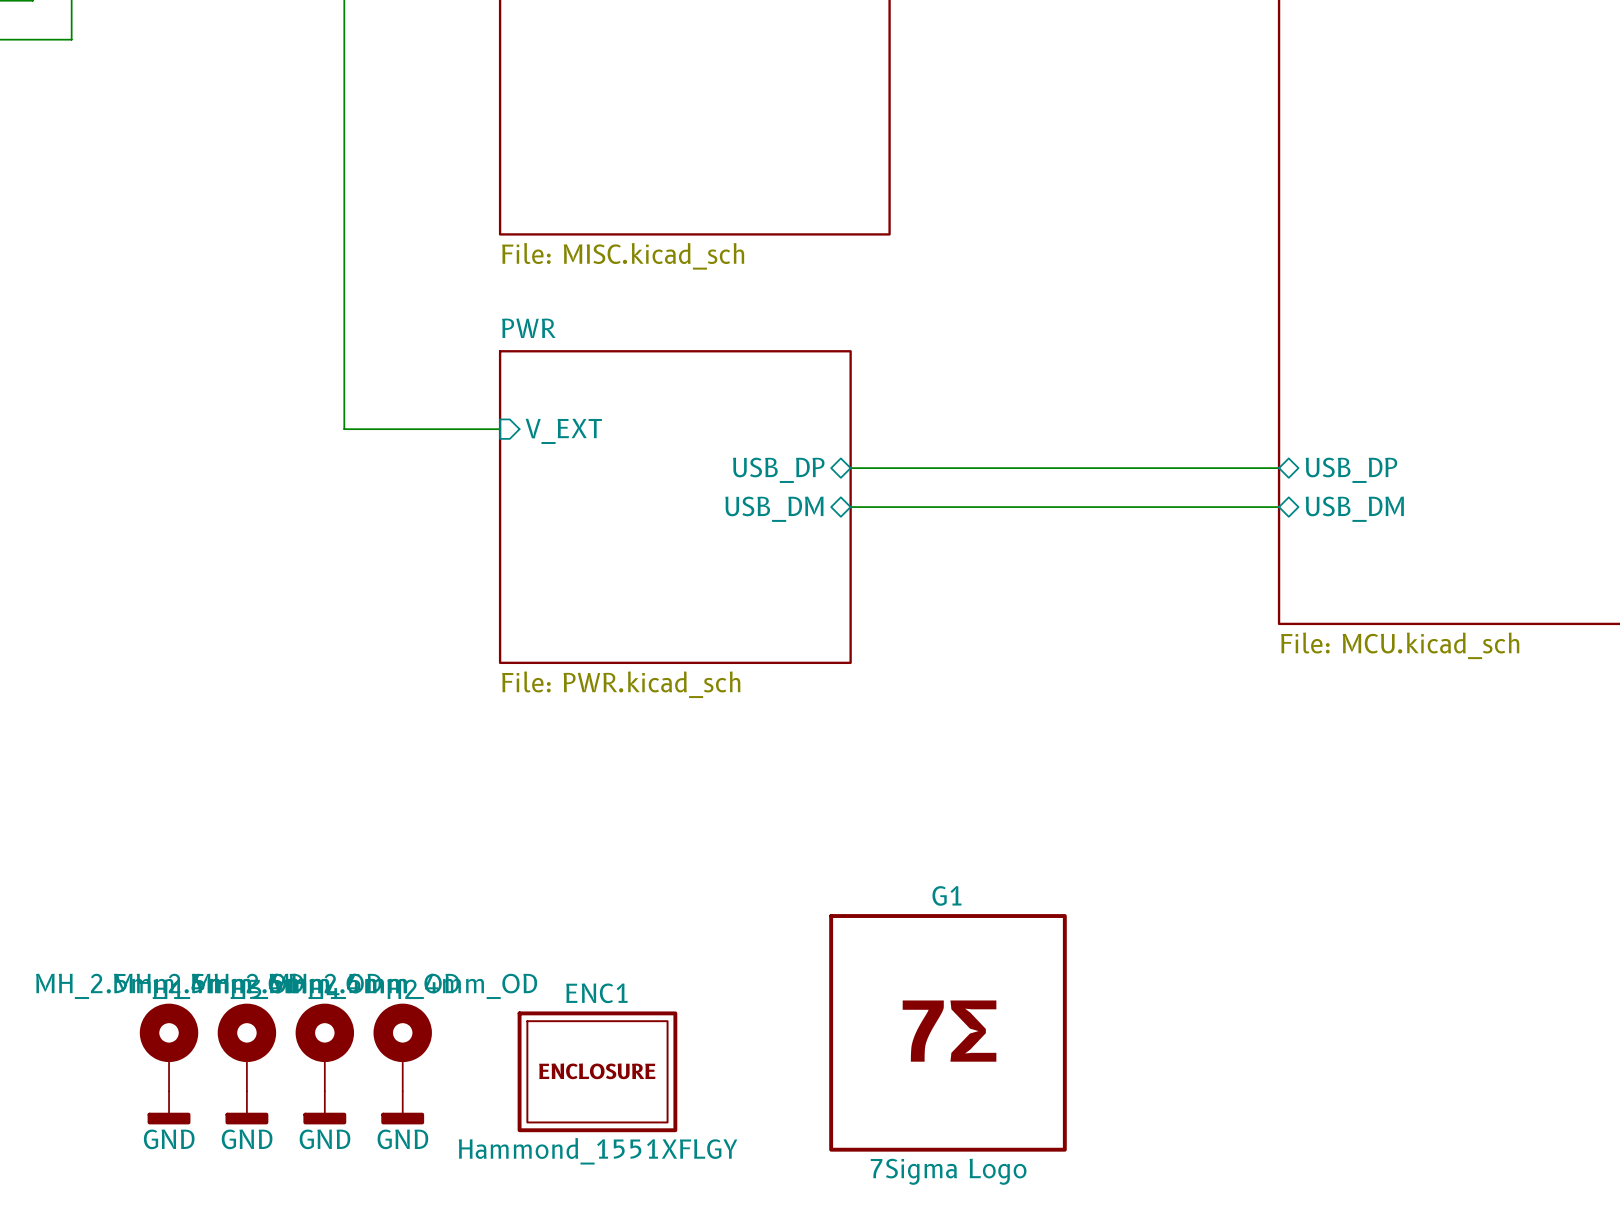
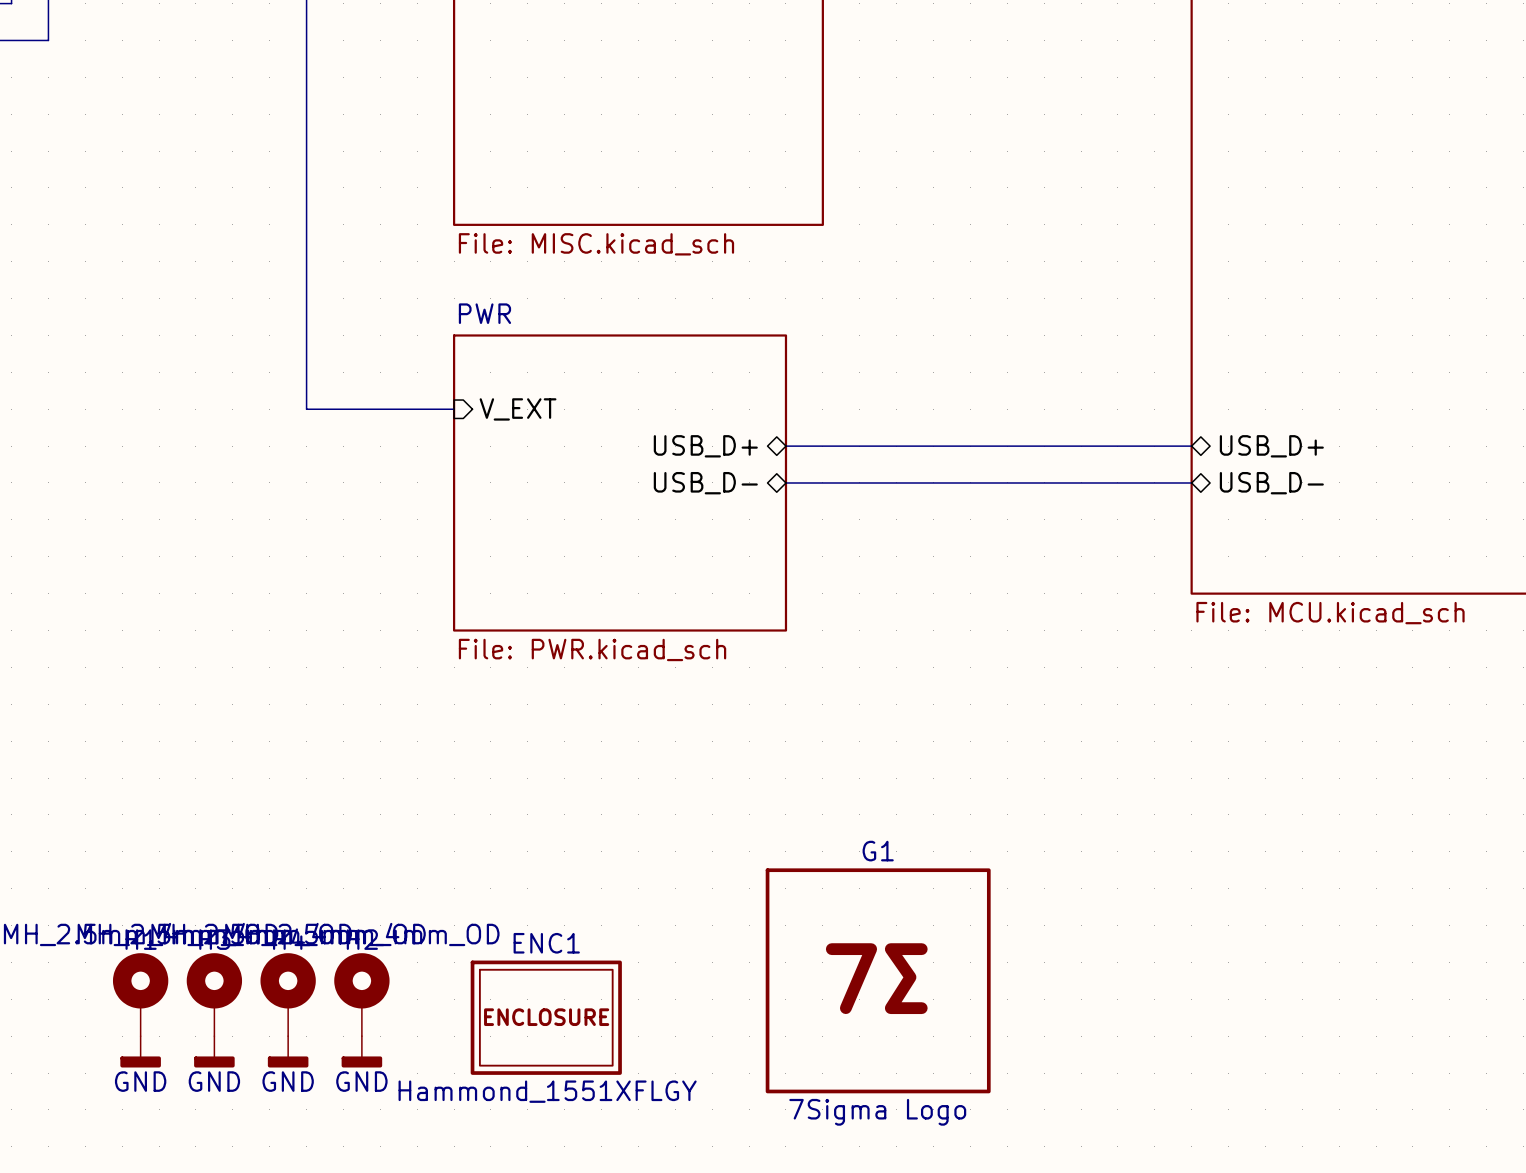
sheet pin: USB_DP (778, 470) -> USB_D+ (705, 446)
sheet pin: USB_DP (1351, 470) -> USB_D+ (1271, 446)
sheet pin: USB_DM (774, 509) -> USB_D- (705, 483)
sheet pin: USB_DM (1354, 509) -> USB_D- (1271, 483)

